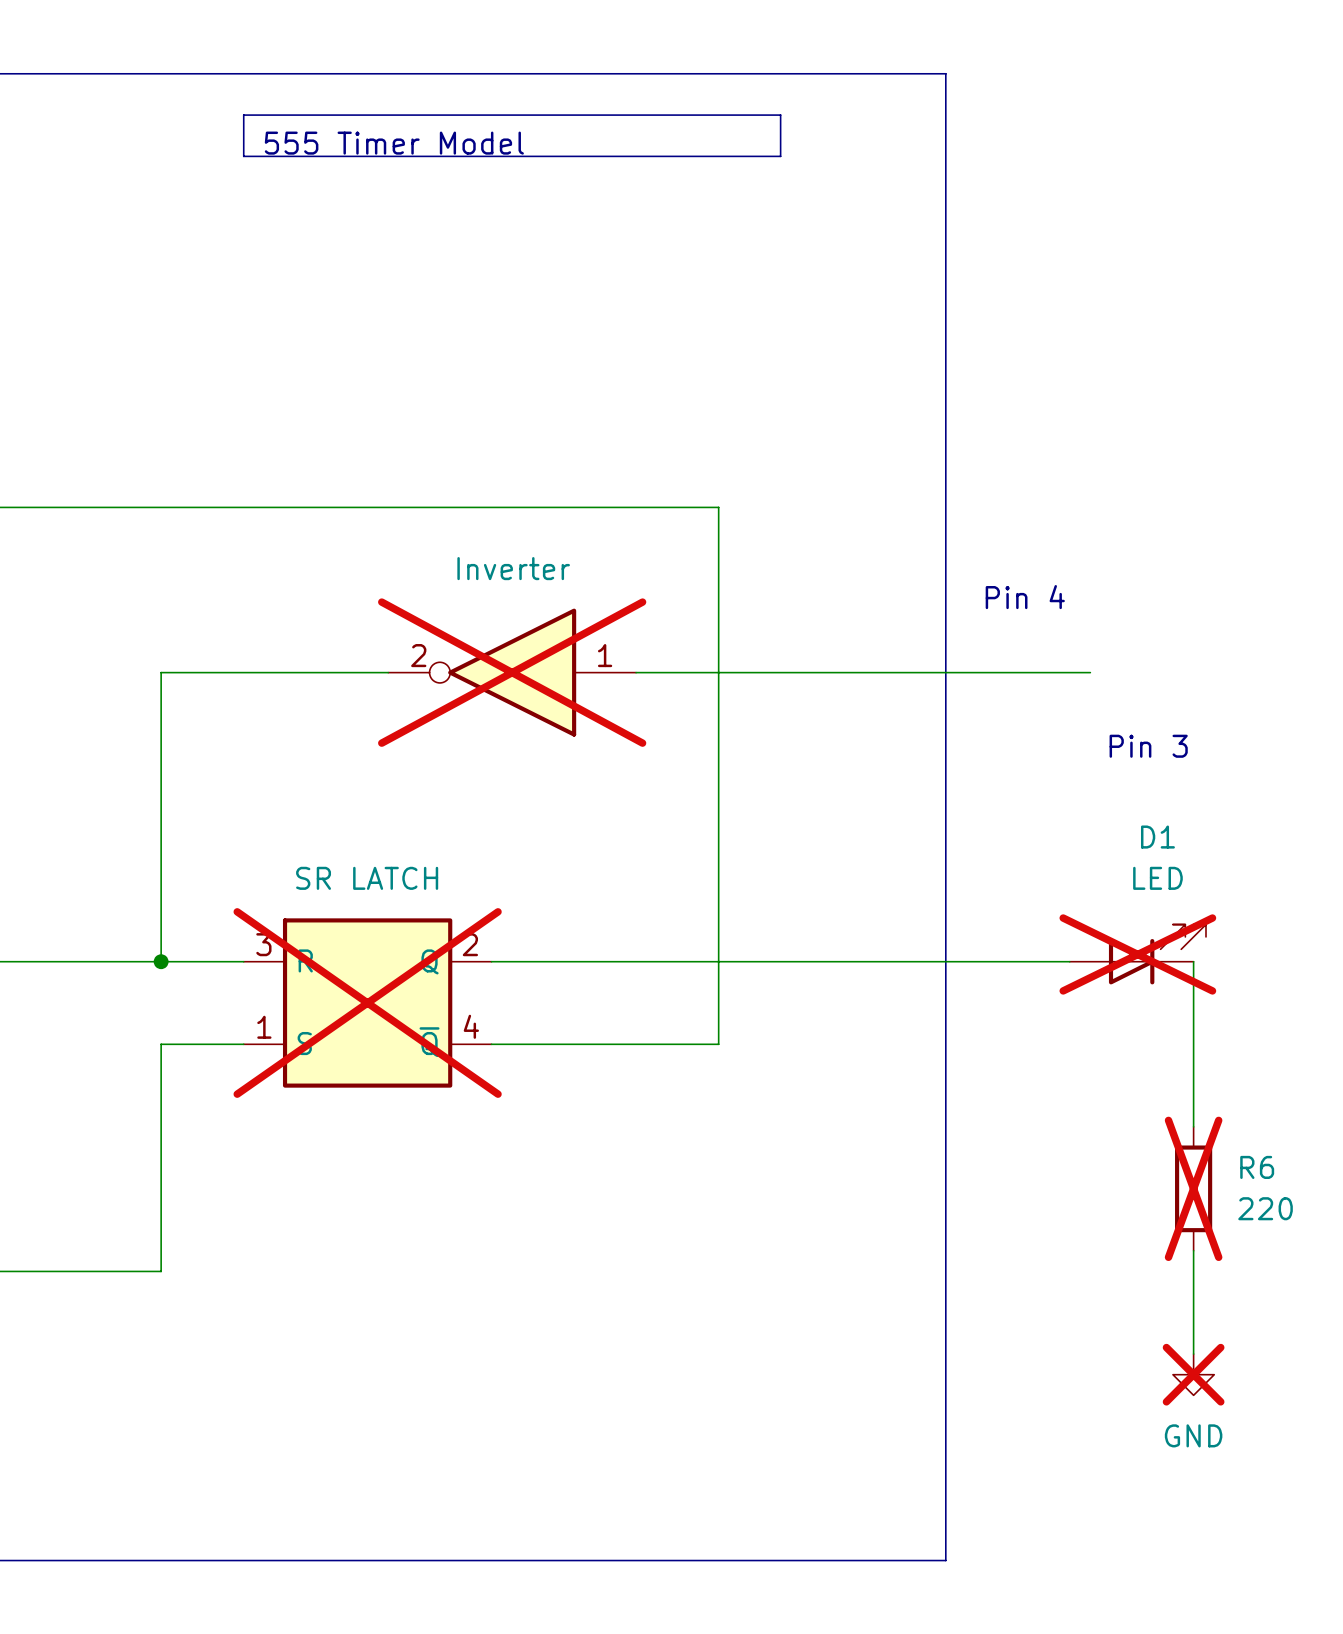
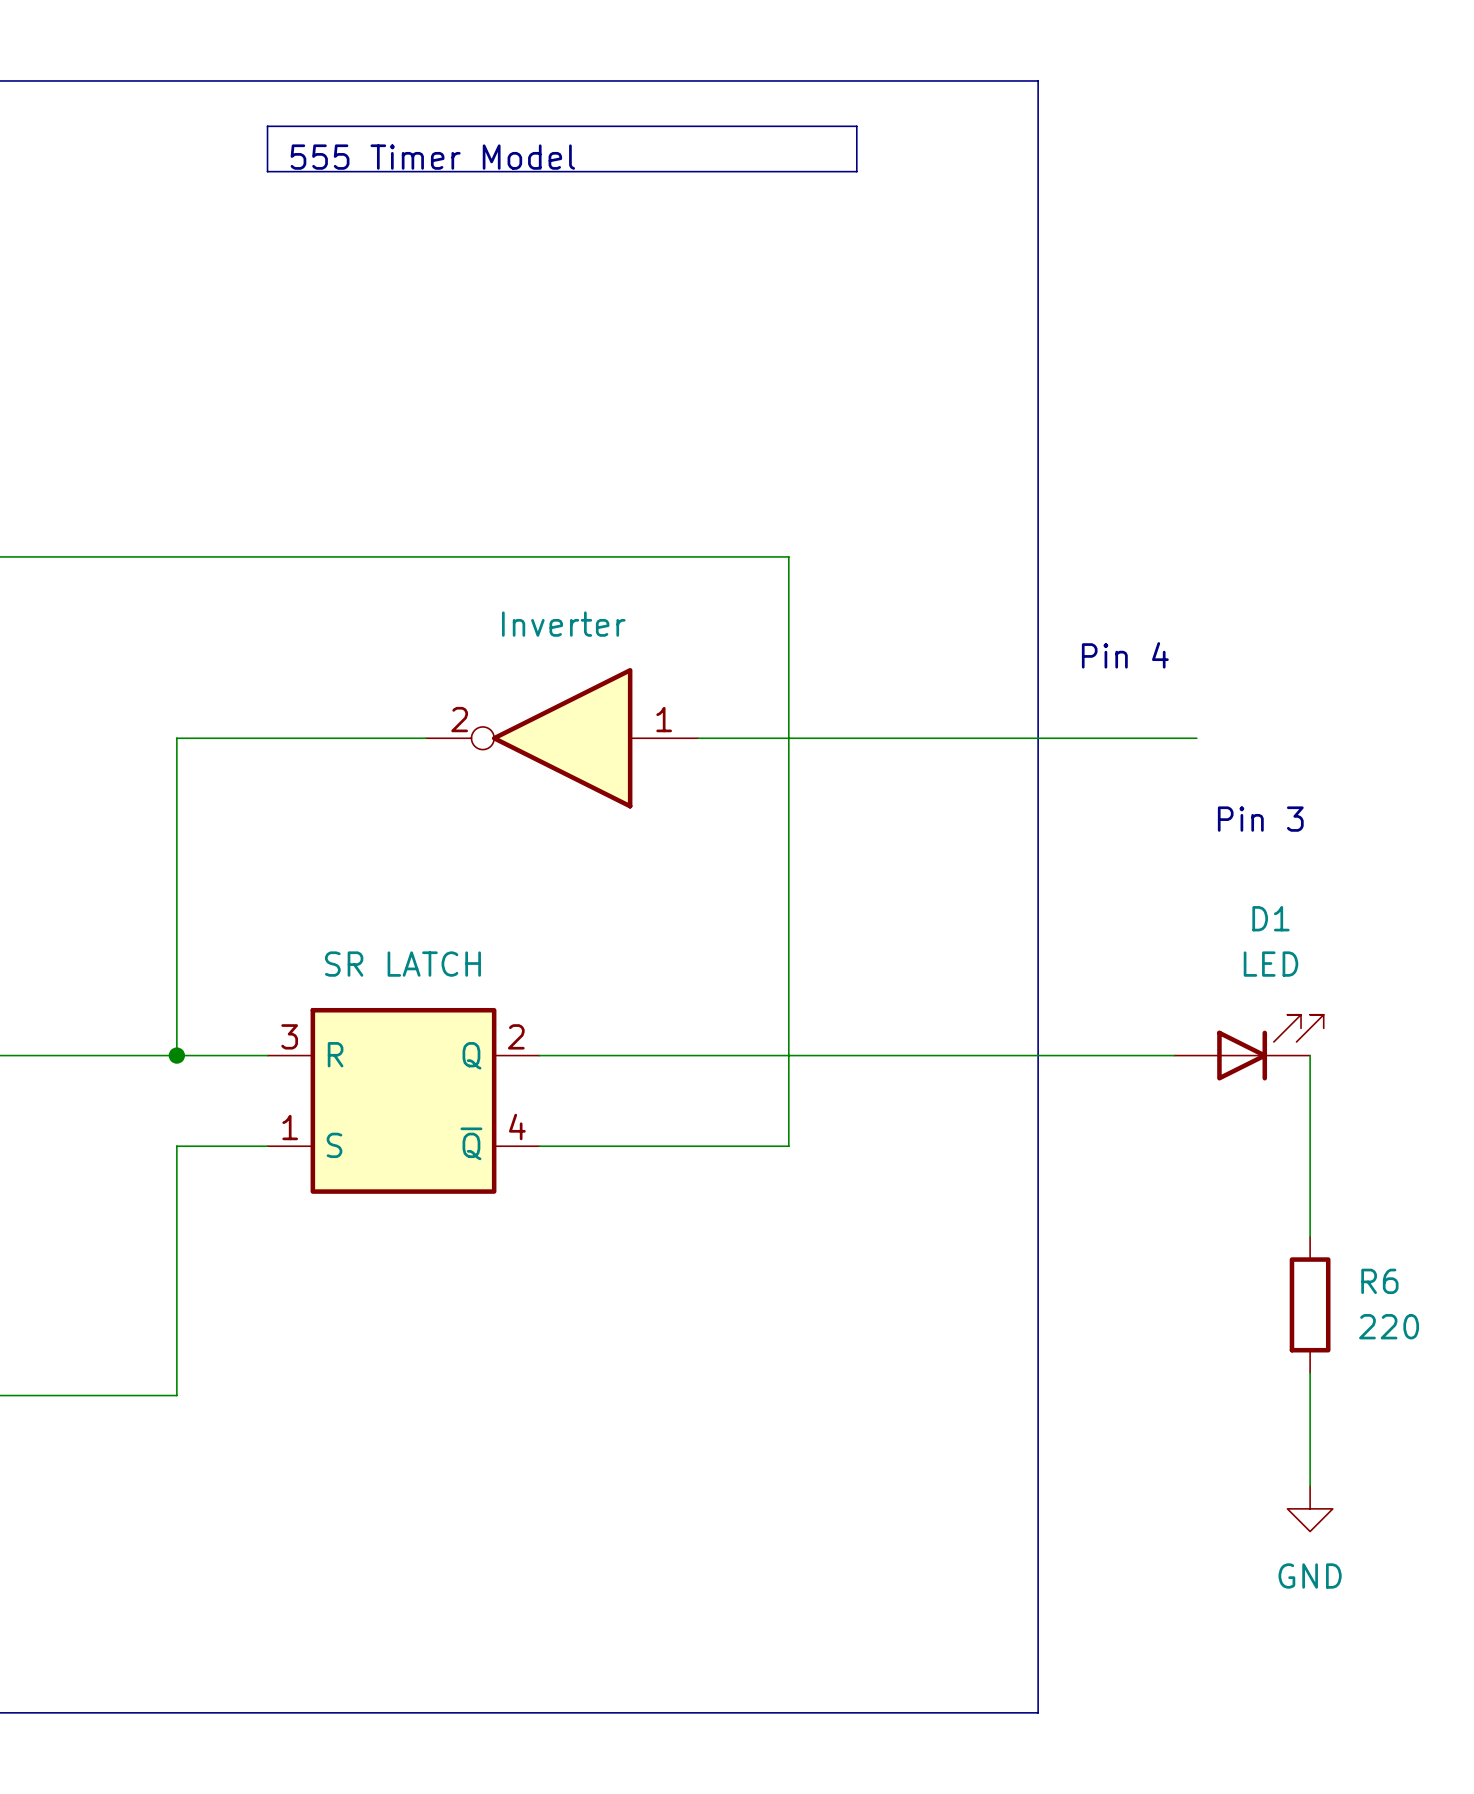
part do-not-place cross: (512, 672) -> none
D1 do-not-place cross: (1137, 954) -> none
part do-not-place cross: (367, 1003) -> none
R6 do-not-place cross: (1193, 1188) -> none
power symbol do-not-place cross: (1193, 1374) -> none

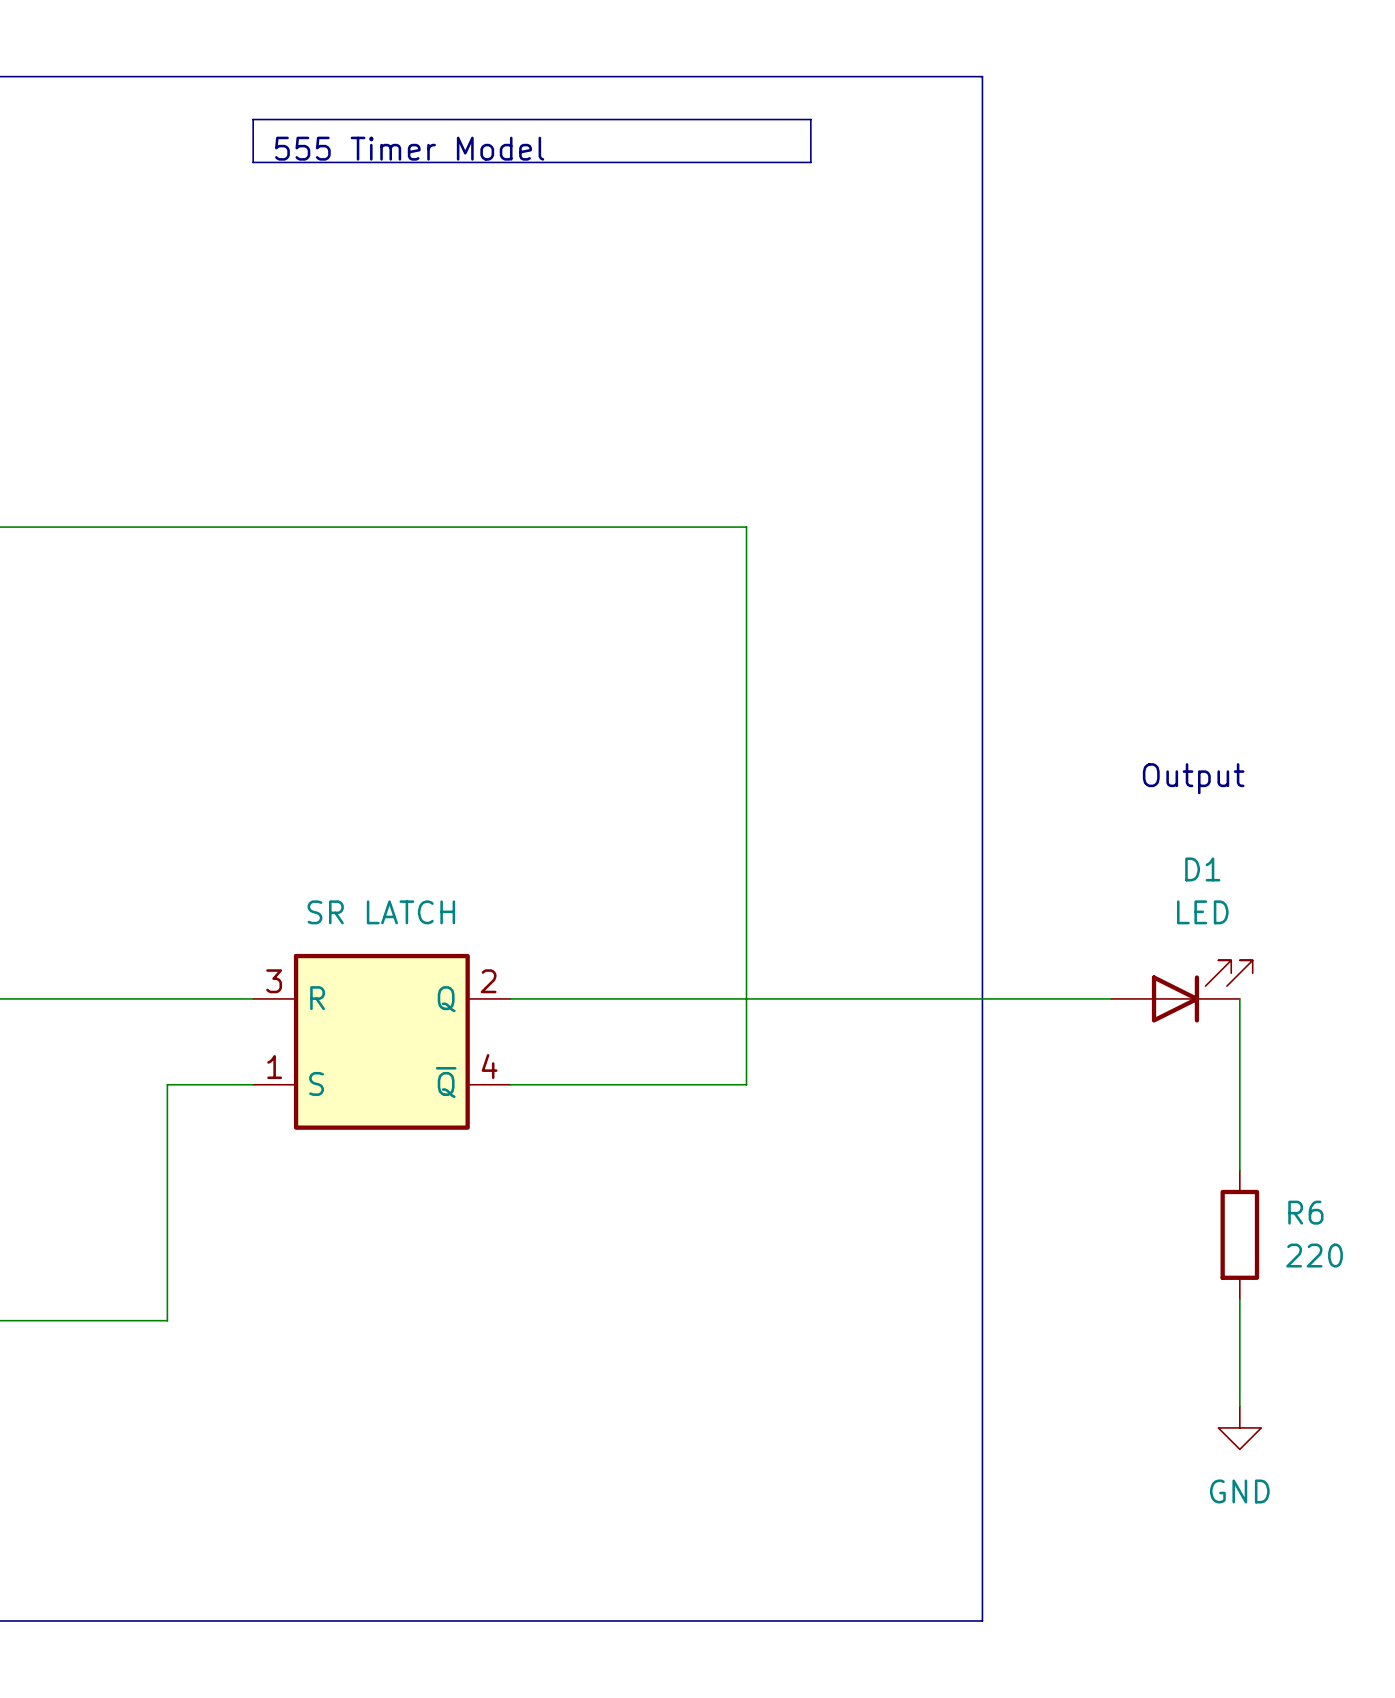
text: Pin 4 (1125, 655) -> none
wire: (426, 738) (176, 738) (176, 1055) -> none
part: Inverter (562, 738) -> none
wire: (698, 738) (1196, 738) -> none
text: Pin 3 (1260, 819) -> Output (1193, 778)
junction: (176, 1055) -> none

